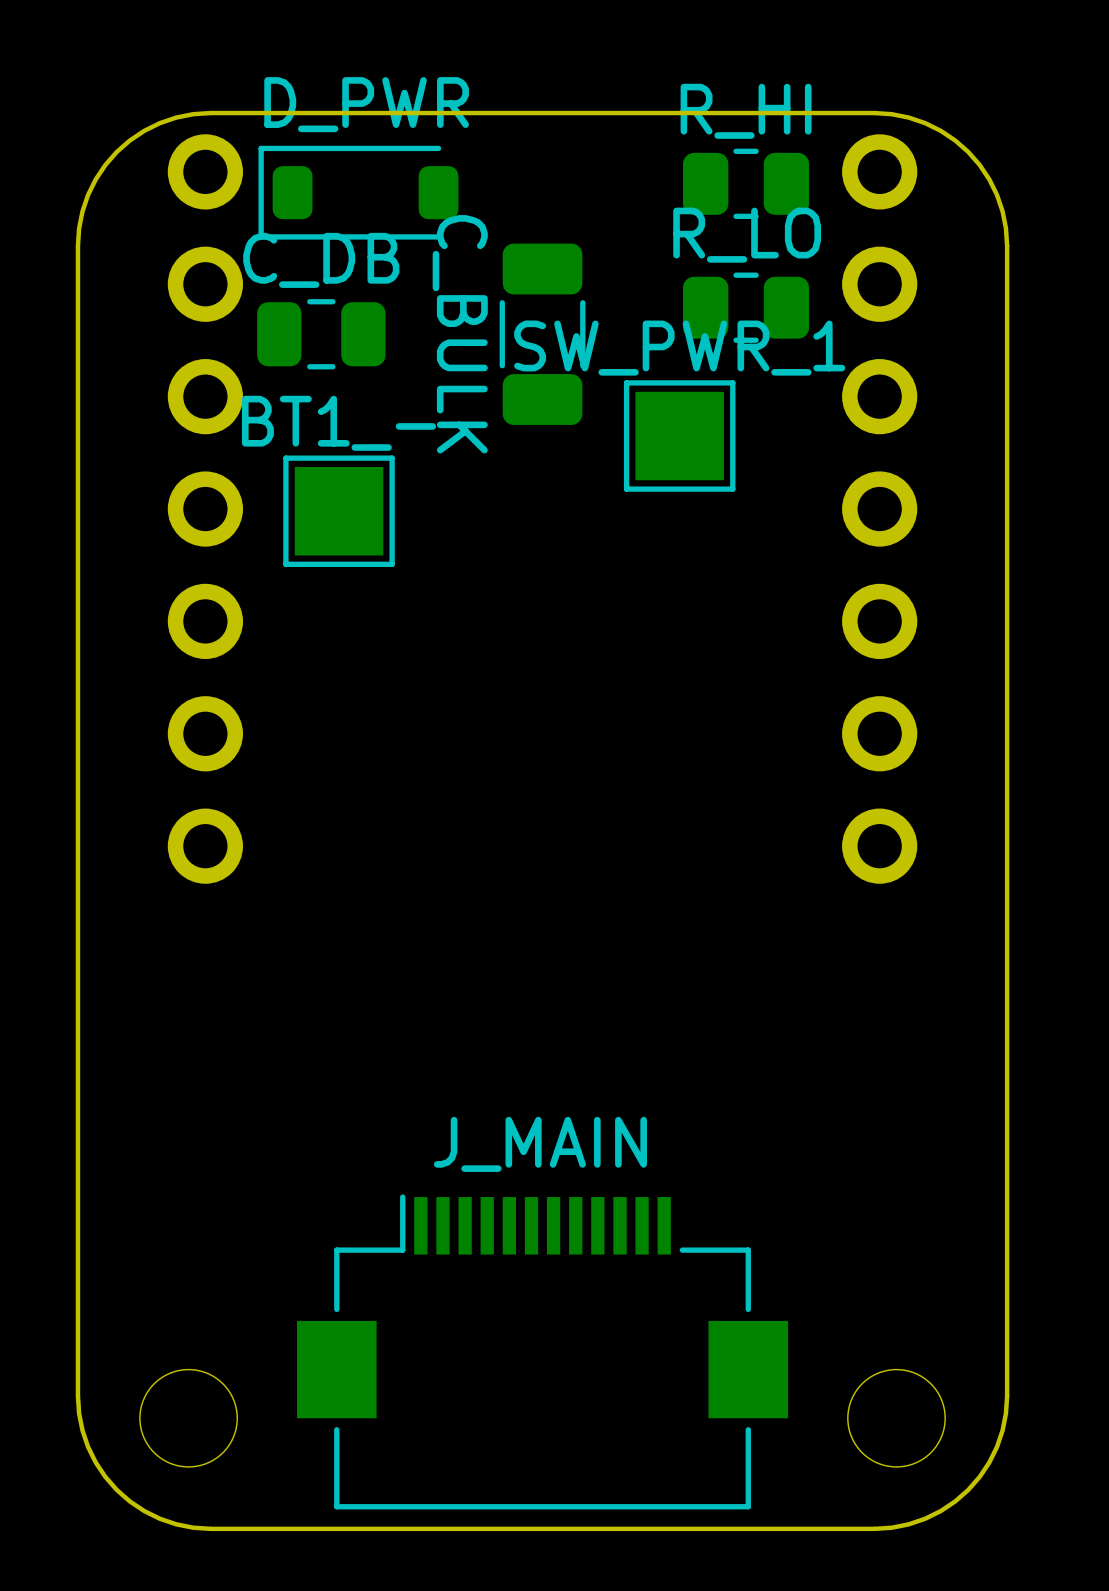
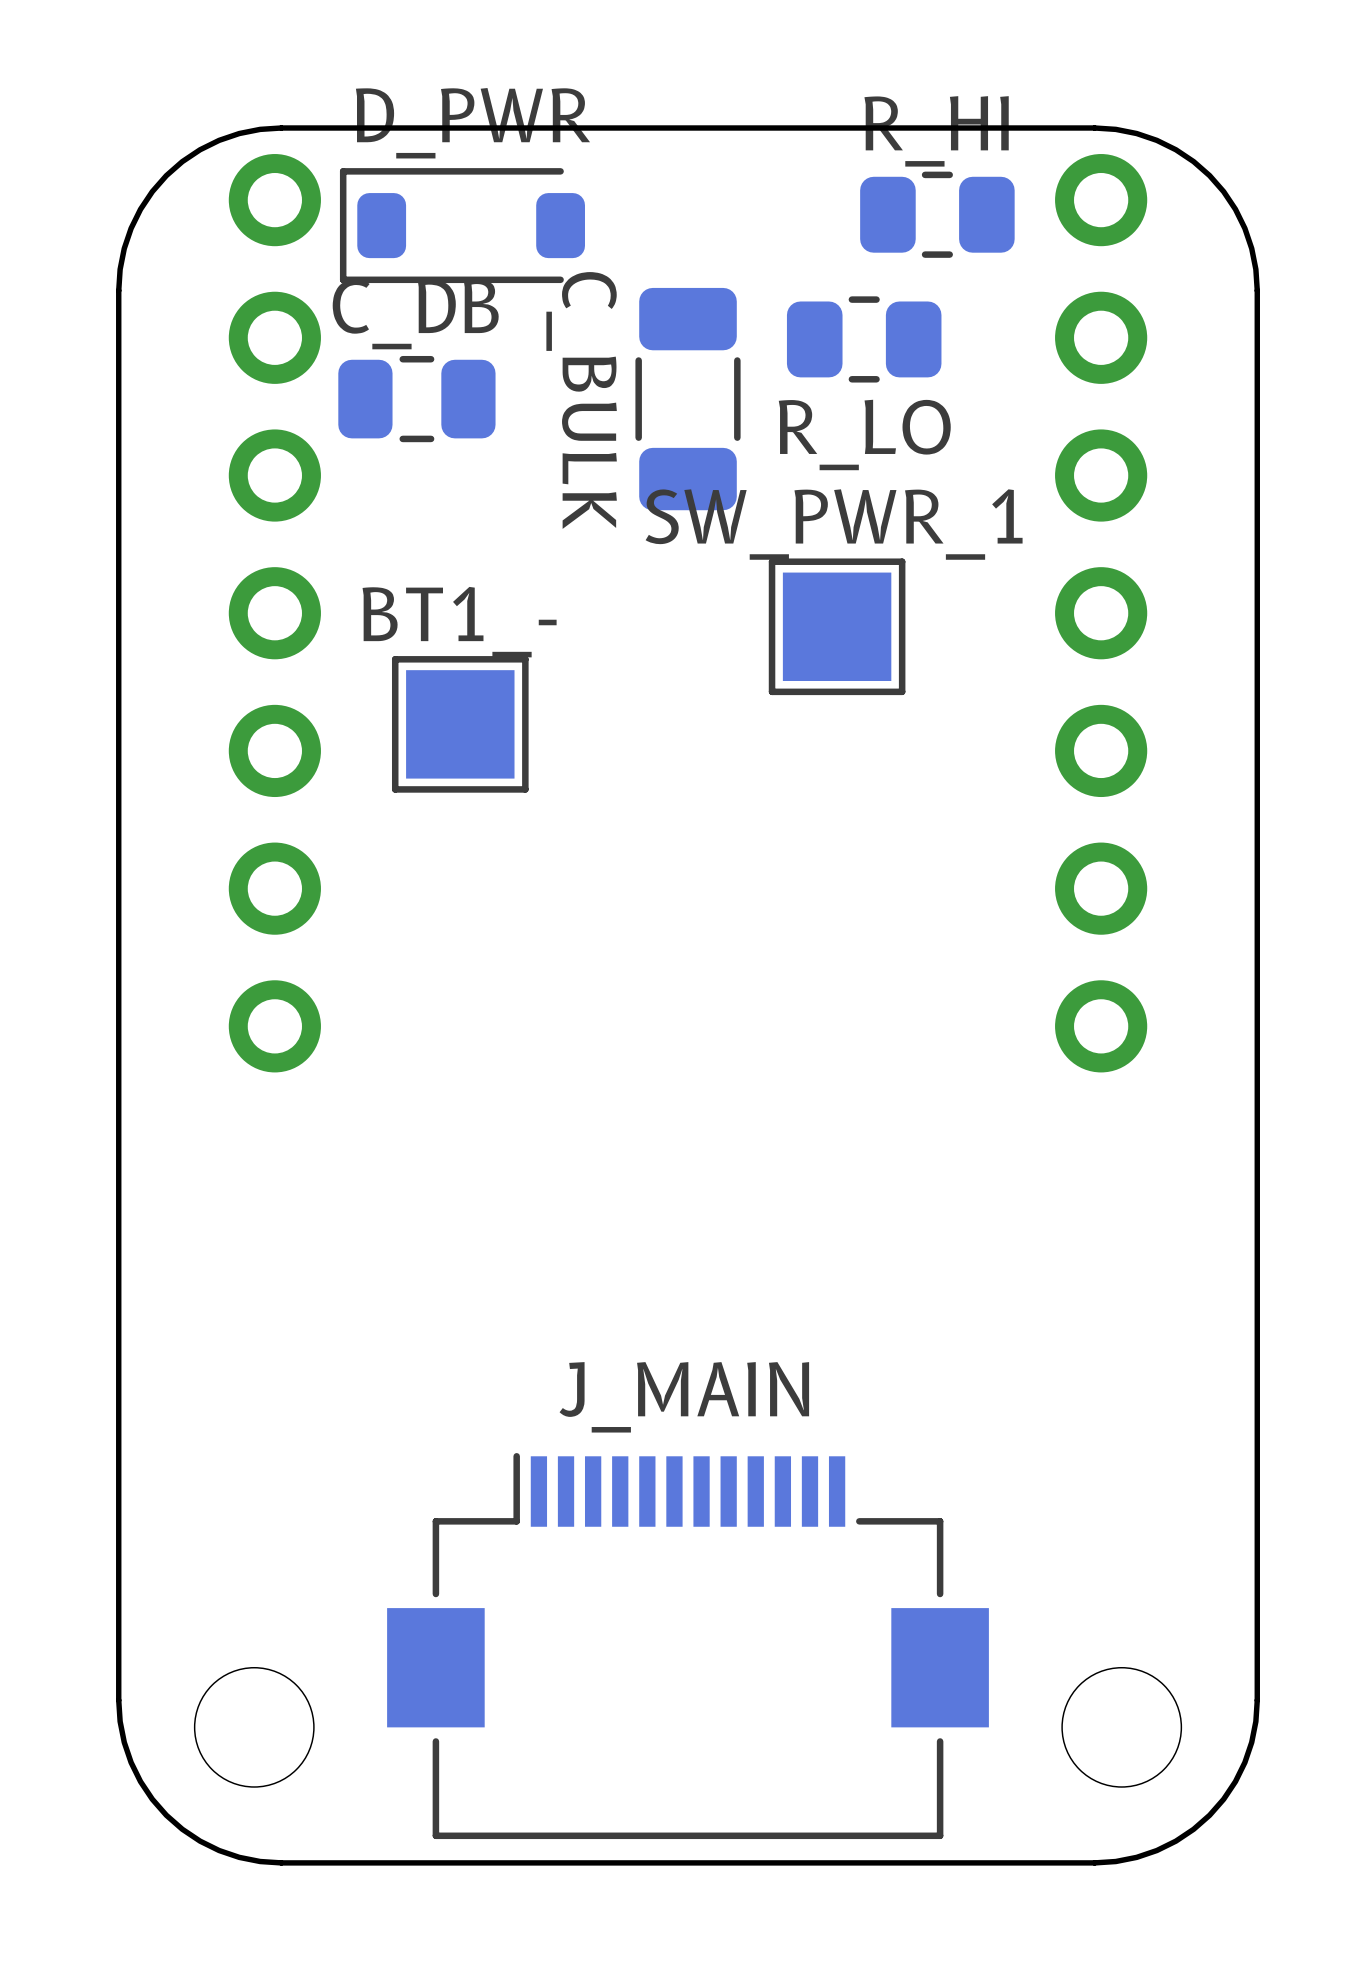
R_LO name position: R_LO (747, 235) -> R_LO (864, 434)
R_LO position: (746, 307) -> (864, 339)
SW_PWR_1 position: (679, 436) -> (837, 626)
BT1_- position: (339, 511) -> (460, 724)

